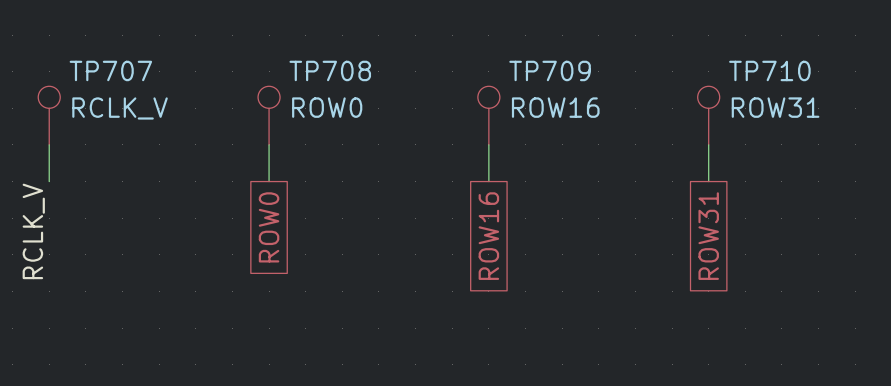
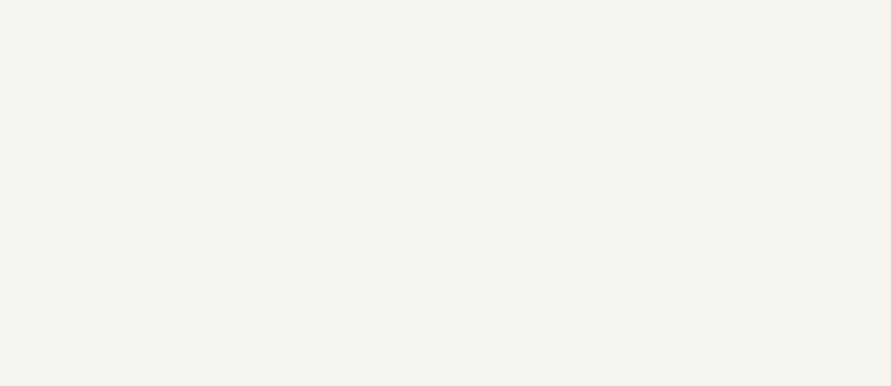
TP707: RCLK_V (49, 115) -> none
TP708: ROW0 (269, 115) -> none
TP709: ROW16 (488, 115) -> none
TP710: ROW31 (708, 115) -> none
wire: (49, 144) (49, 181) -> none
wire: (269, 144) (269, 181) -> none
wire: (488, 144) (488, 181) -> none
wire: (708, 144) (708, 181) -> none
global label: ROW0 (269, 227) -> none
label: RCLK_V (33, 231) -> none
global label: ROW16 (488, 236) -> none
global label: ROW31 (708, 236) -> none

